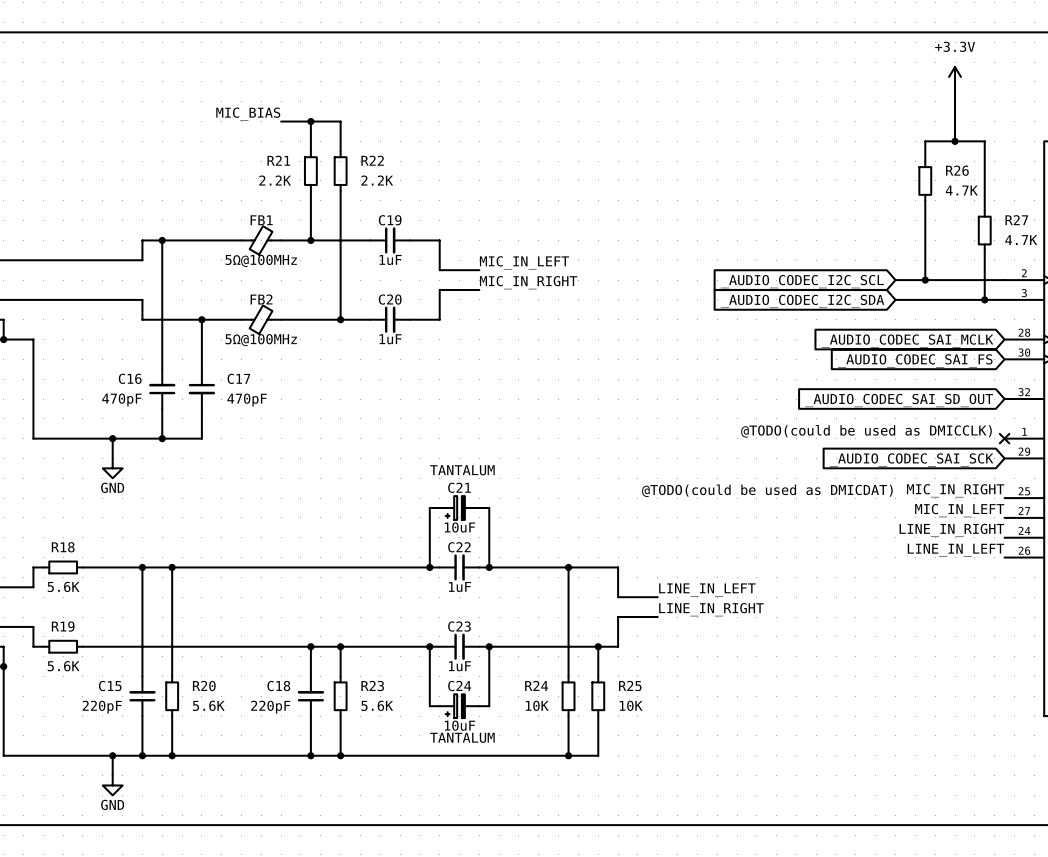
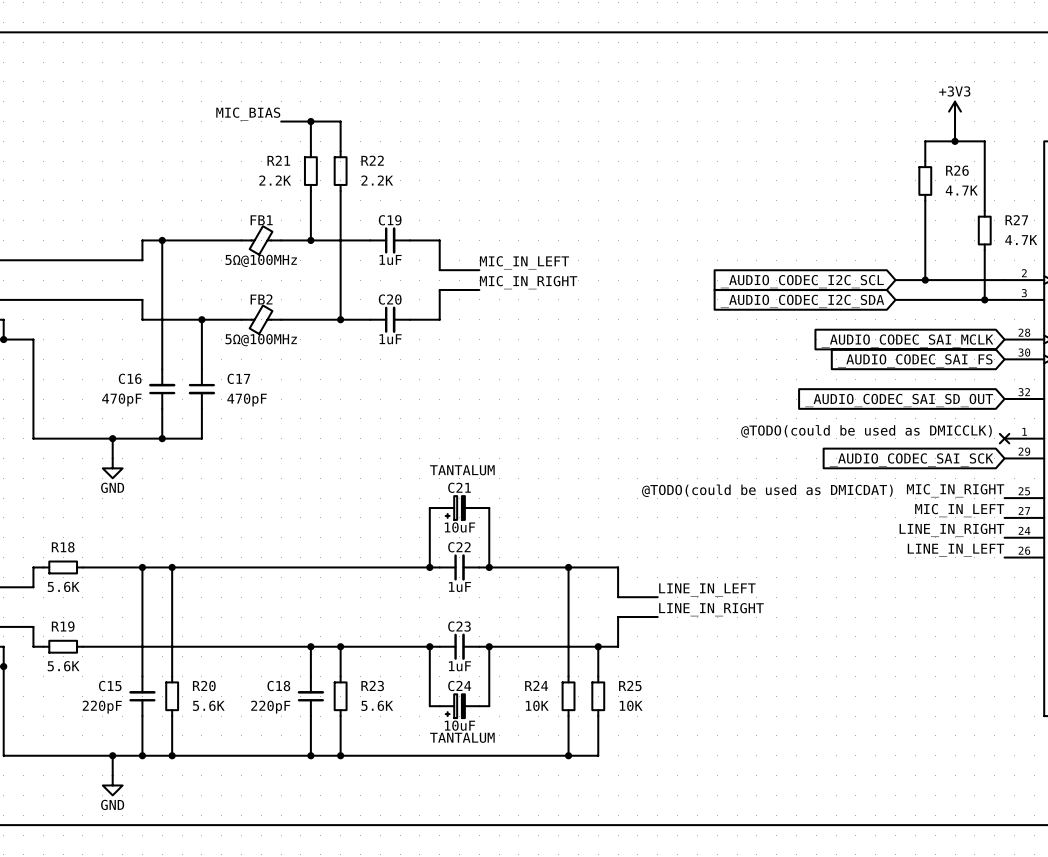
power symbol: +3.3V (955, 76) -> none
power symbol: none -> +3V3 (955, 111)

